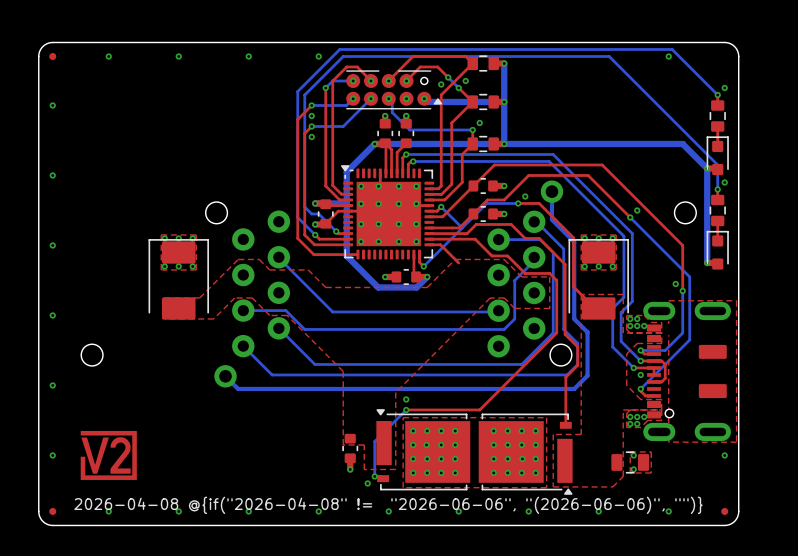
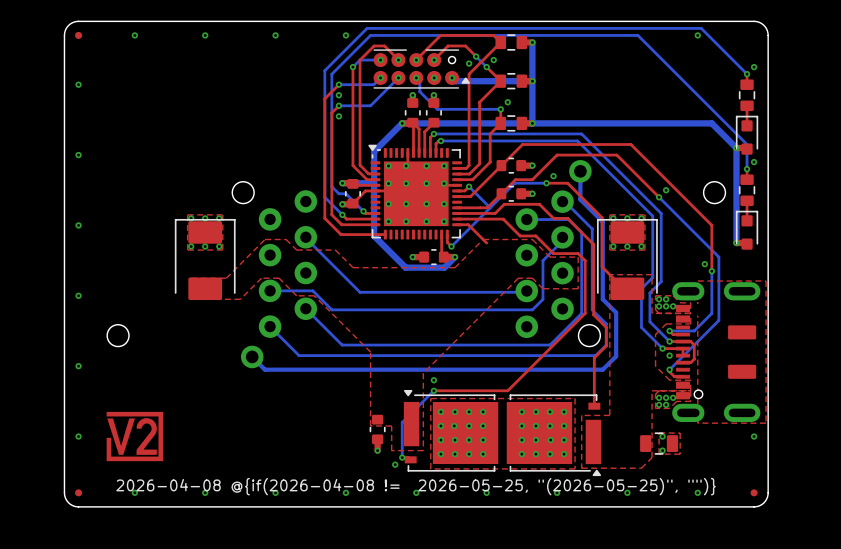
drawing shape: [74, 496, 703, 515] -> [116, 477, 716, 496]

